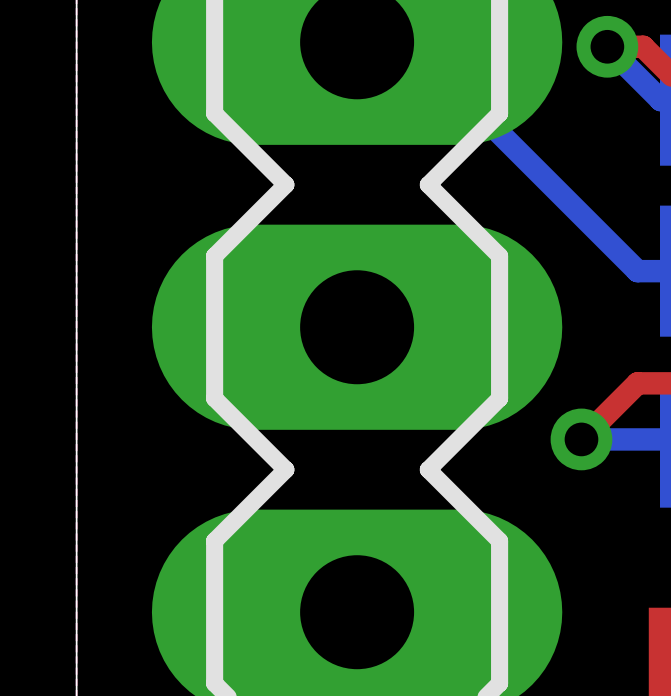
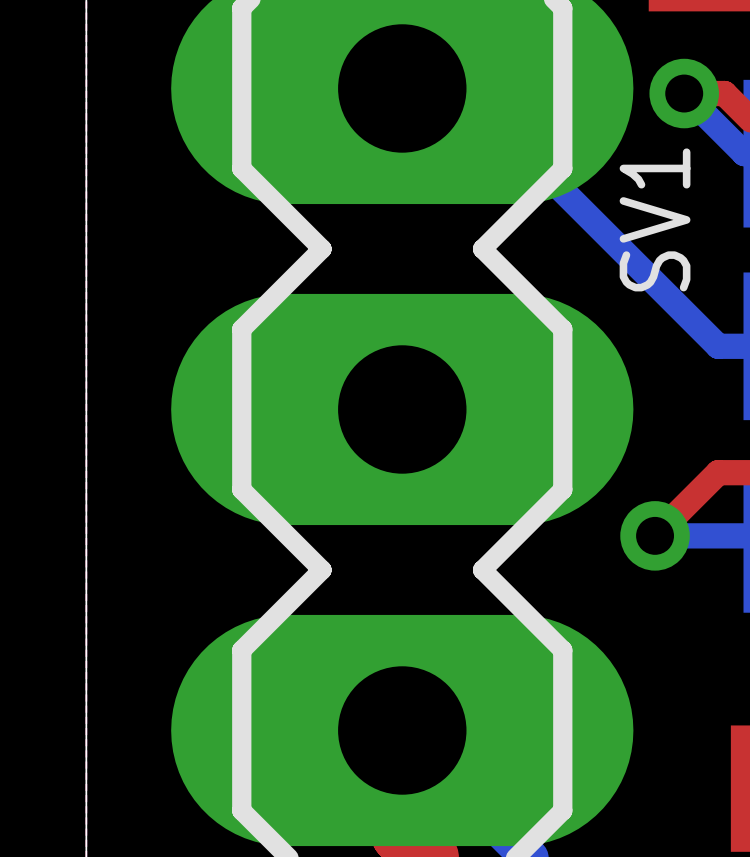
SV1 name: none -> SV1 (655, 219)

